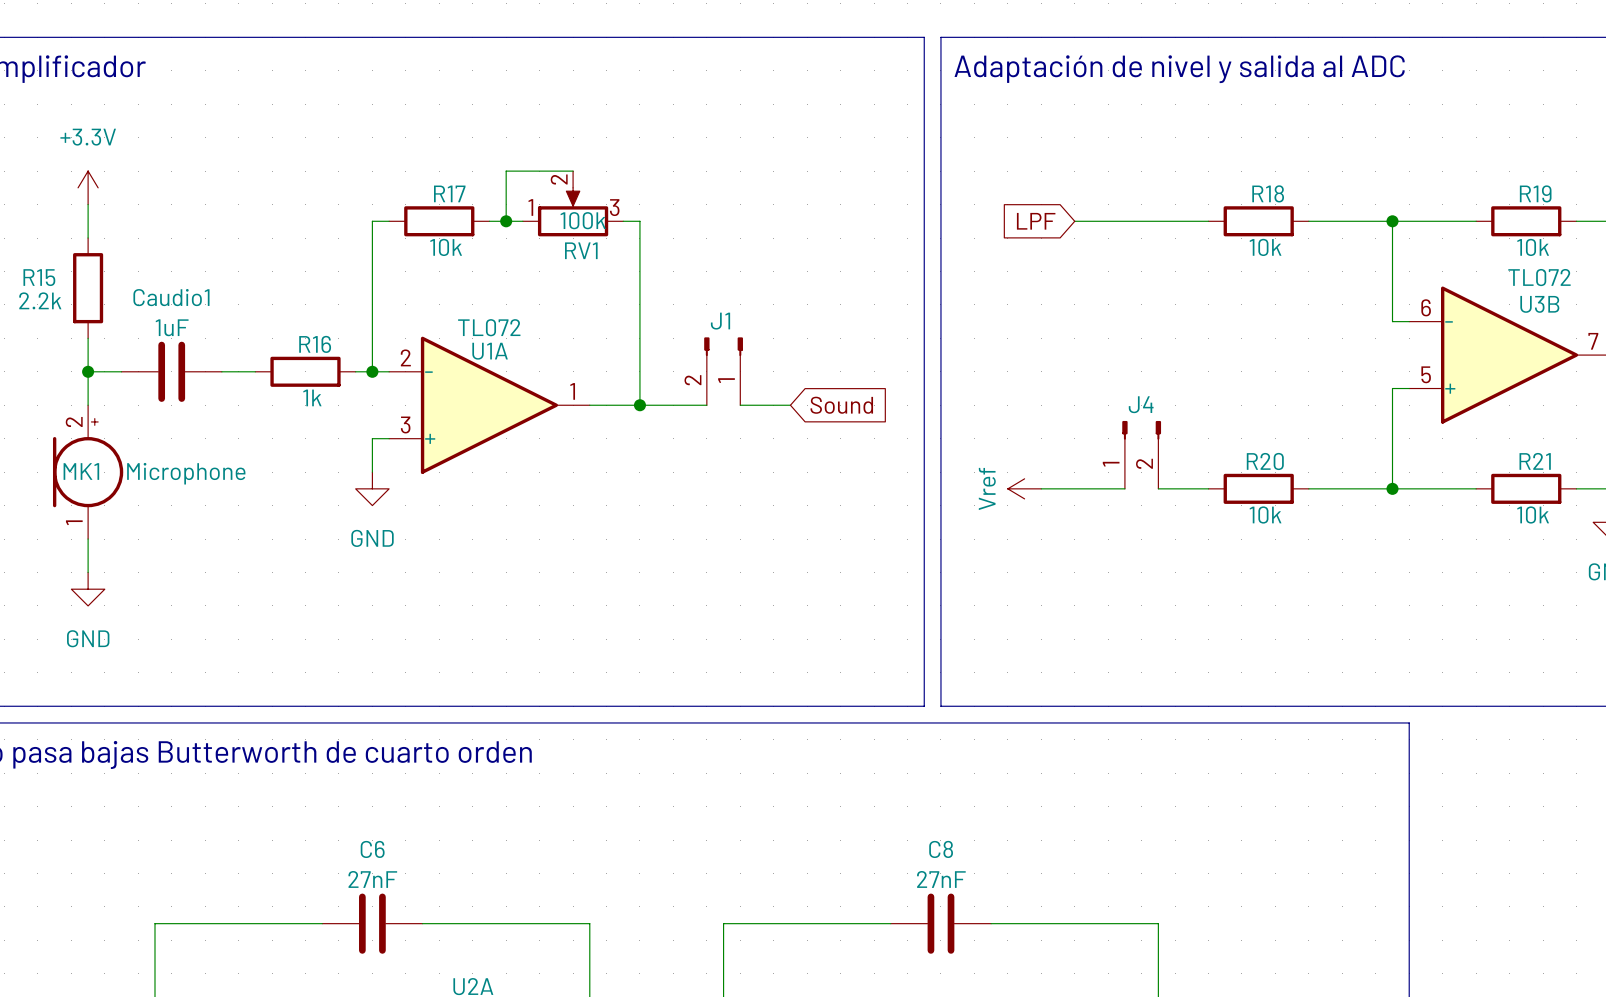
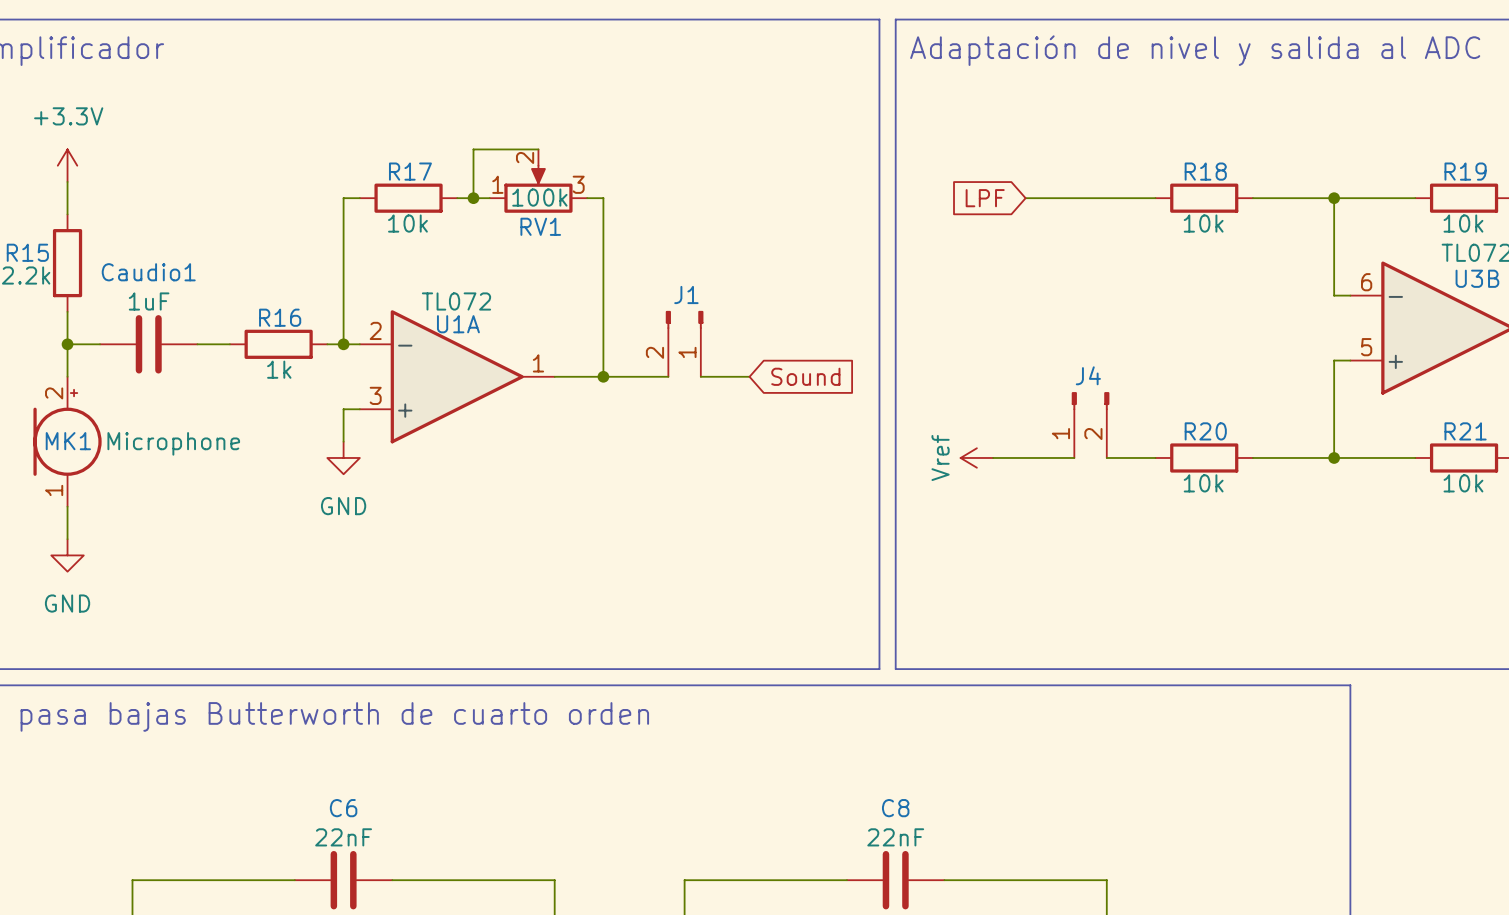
C6 value: 27nF (372, 879) -> 22nF (343, 837)
C8 value: 27nF (941, 879) -> 22nF (895, 837)

